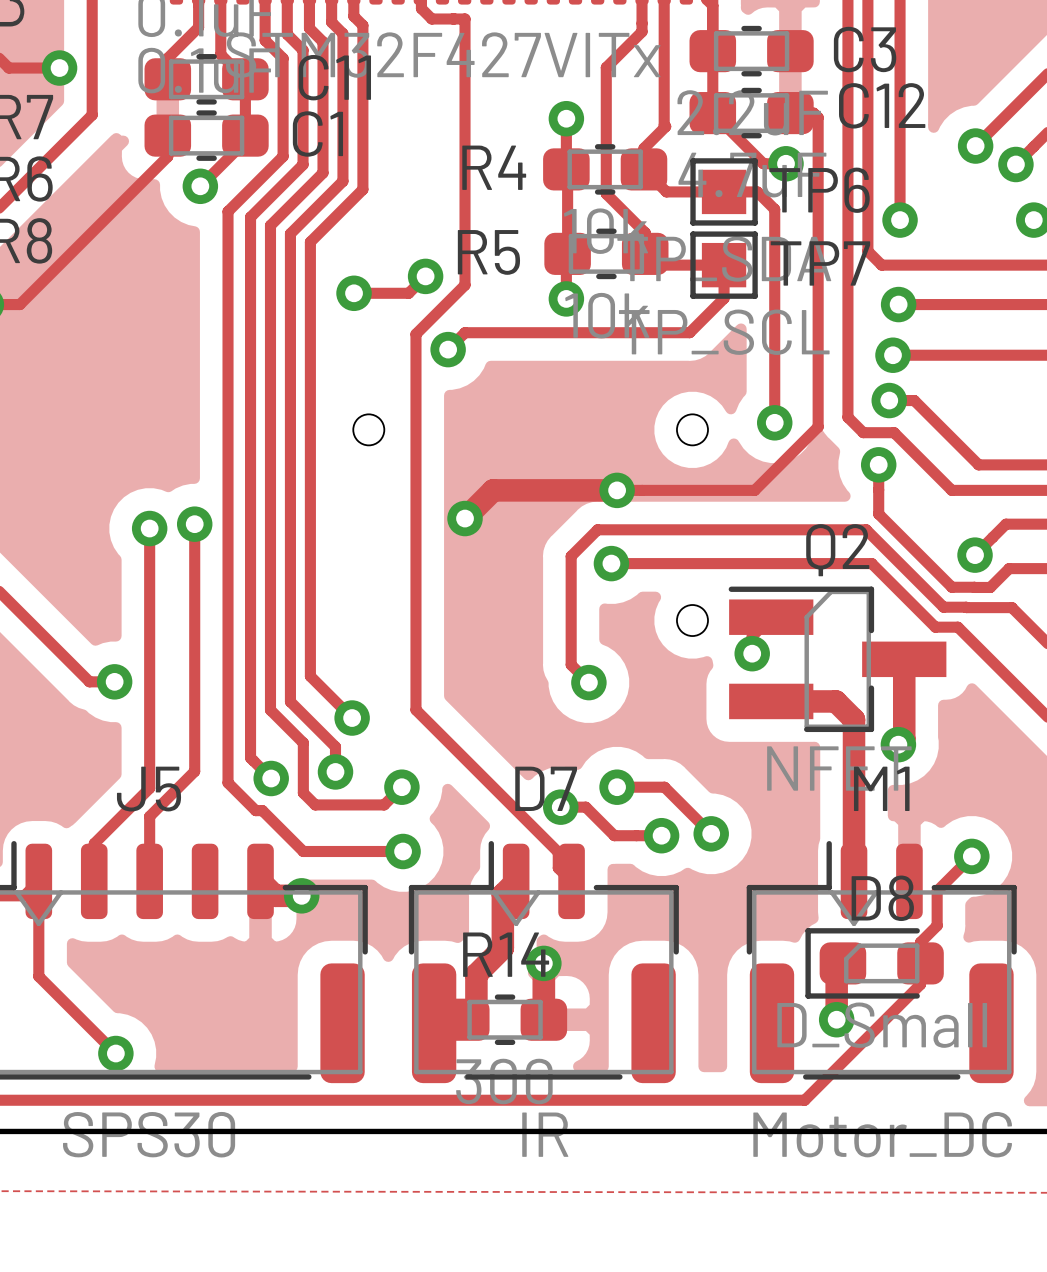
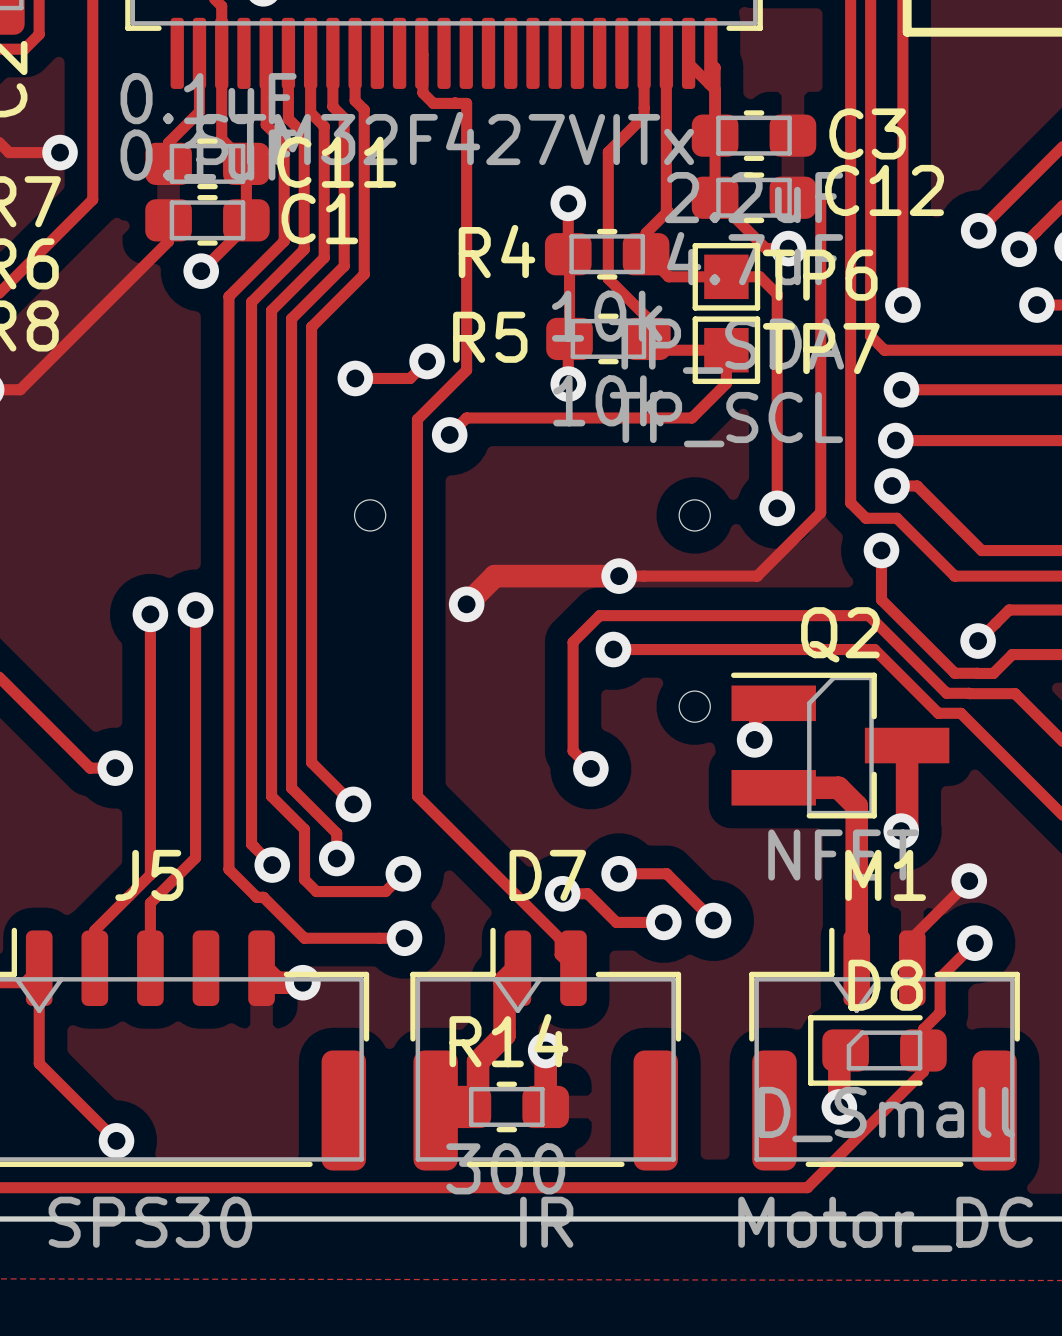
track: none -> (969, 881) (912, 937) (912, 968)
via: none -> (969, 881)

